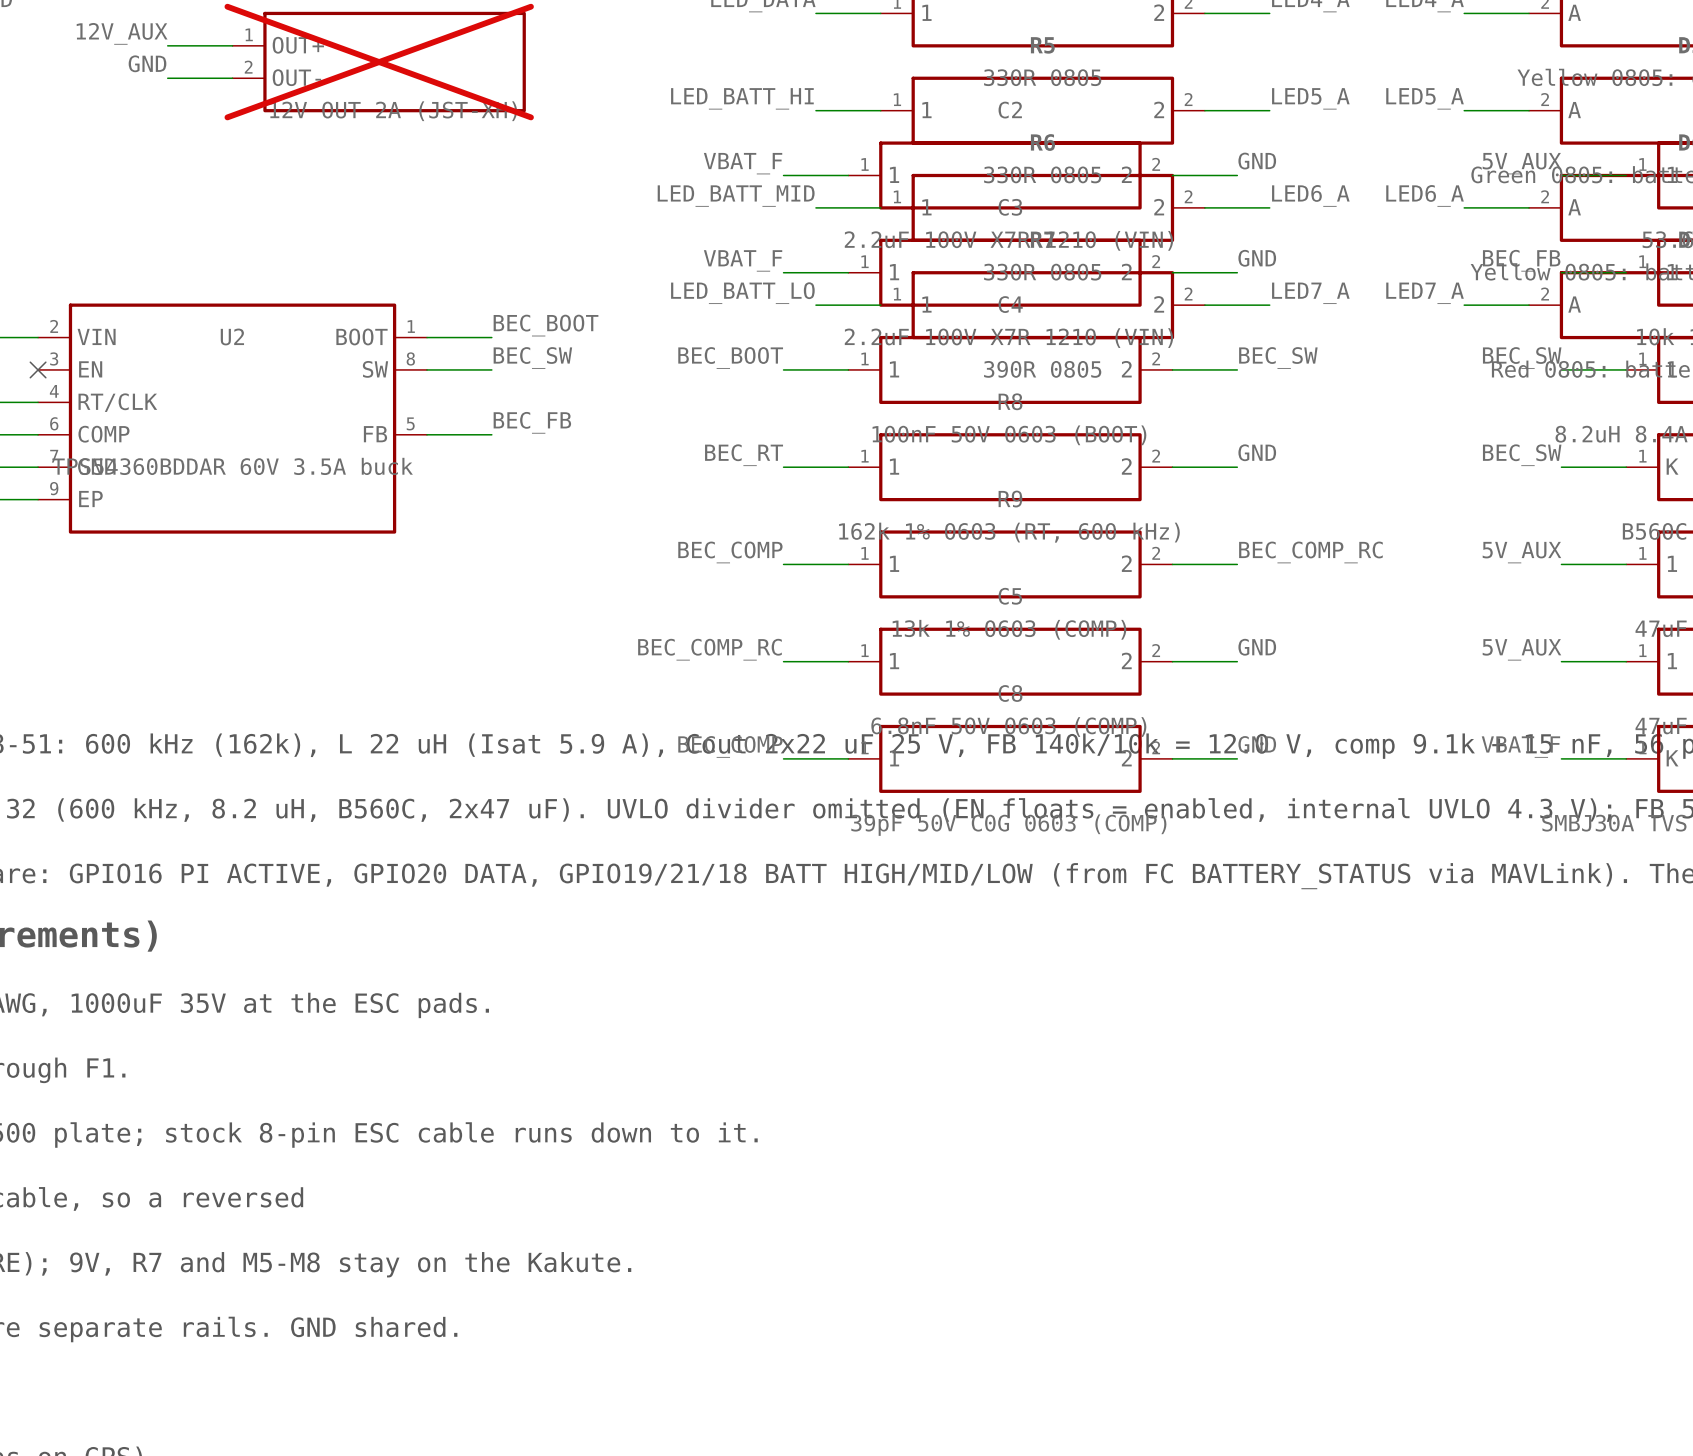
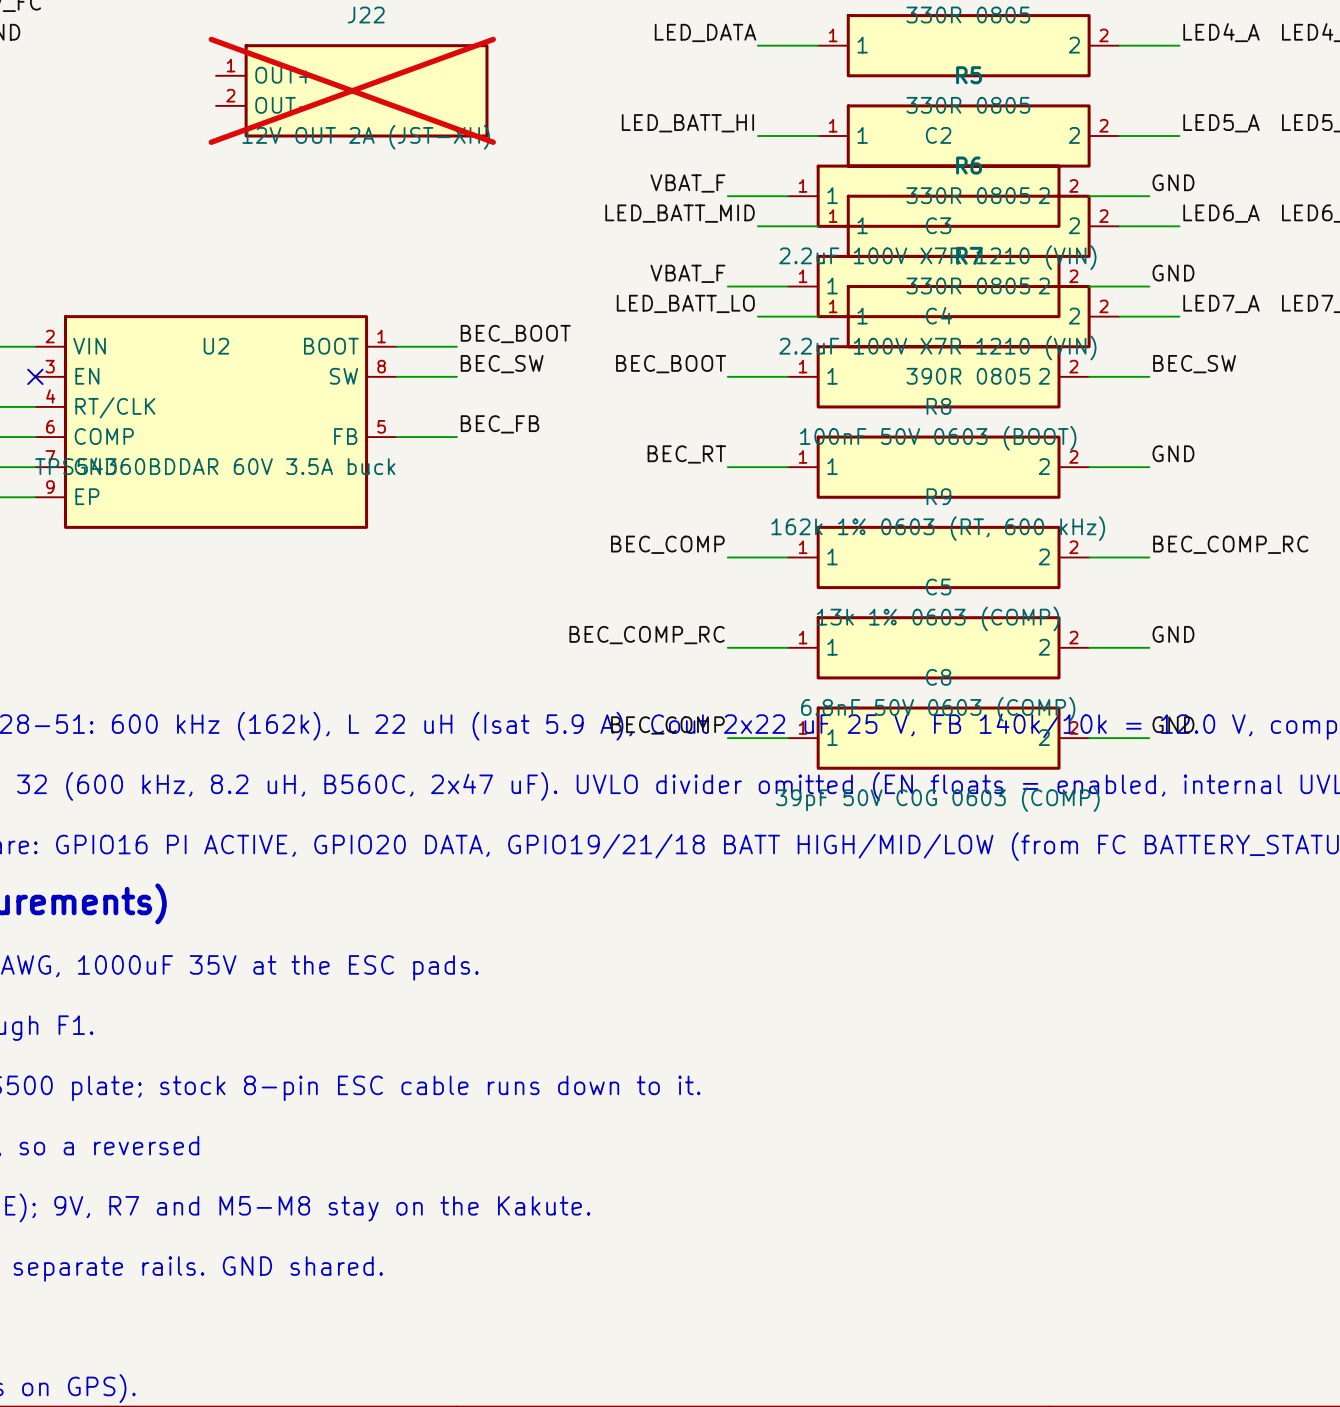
label: 12V_AUX (122, 33) -> none
wire: (167, 45) (232, 45) -> none
label: GND (147, 63) -> none
wire: (167, 78) (232, 78) -> none

